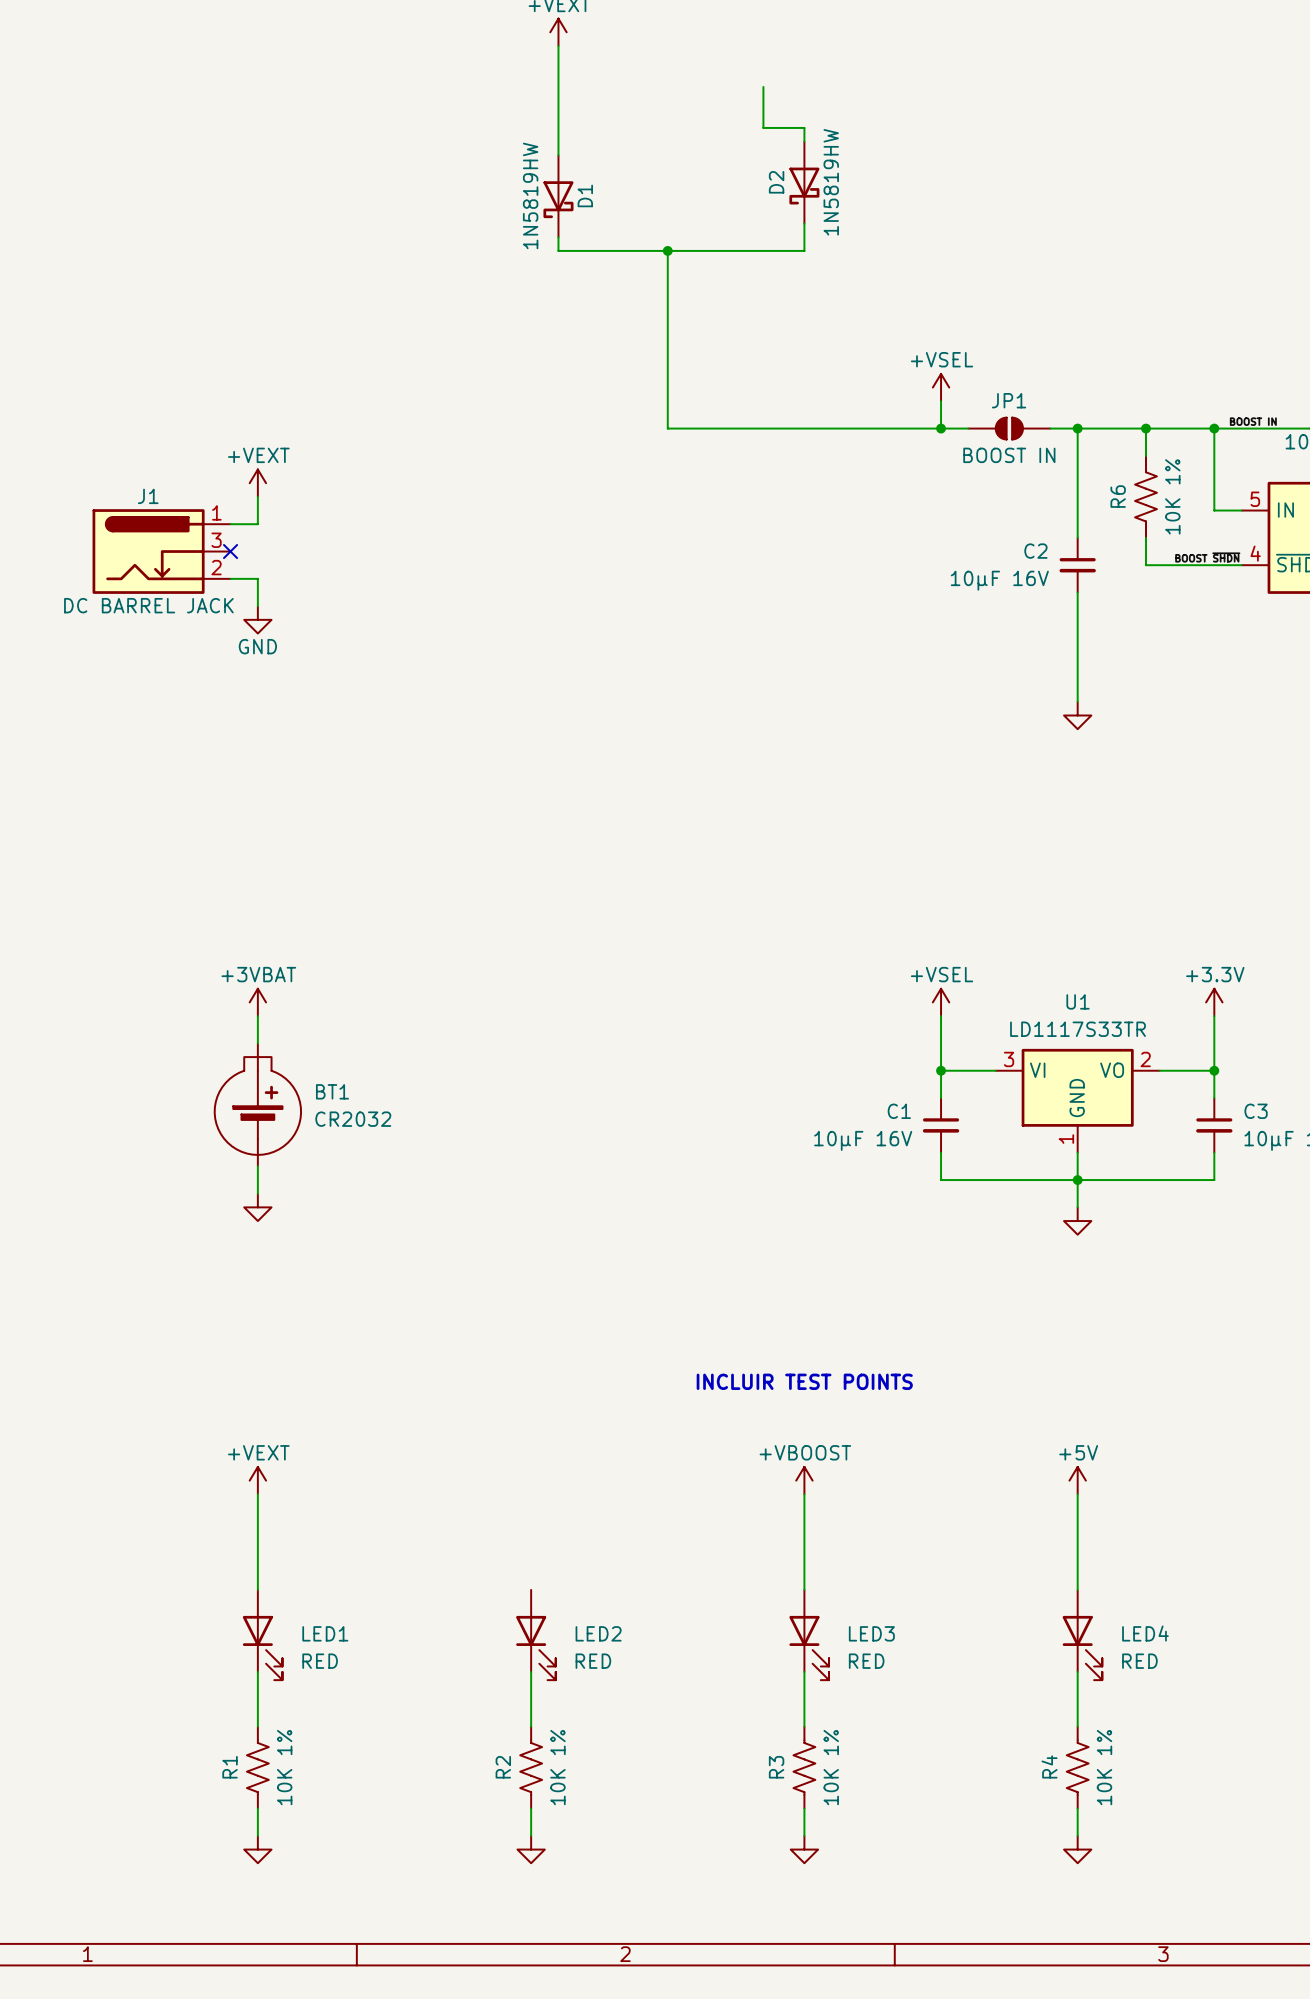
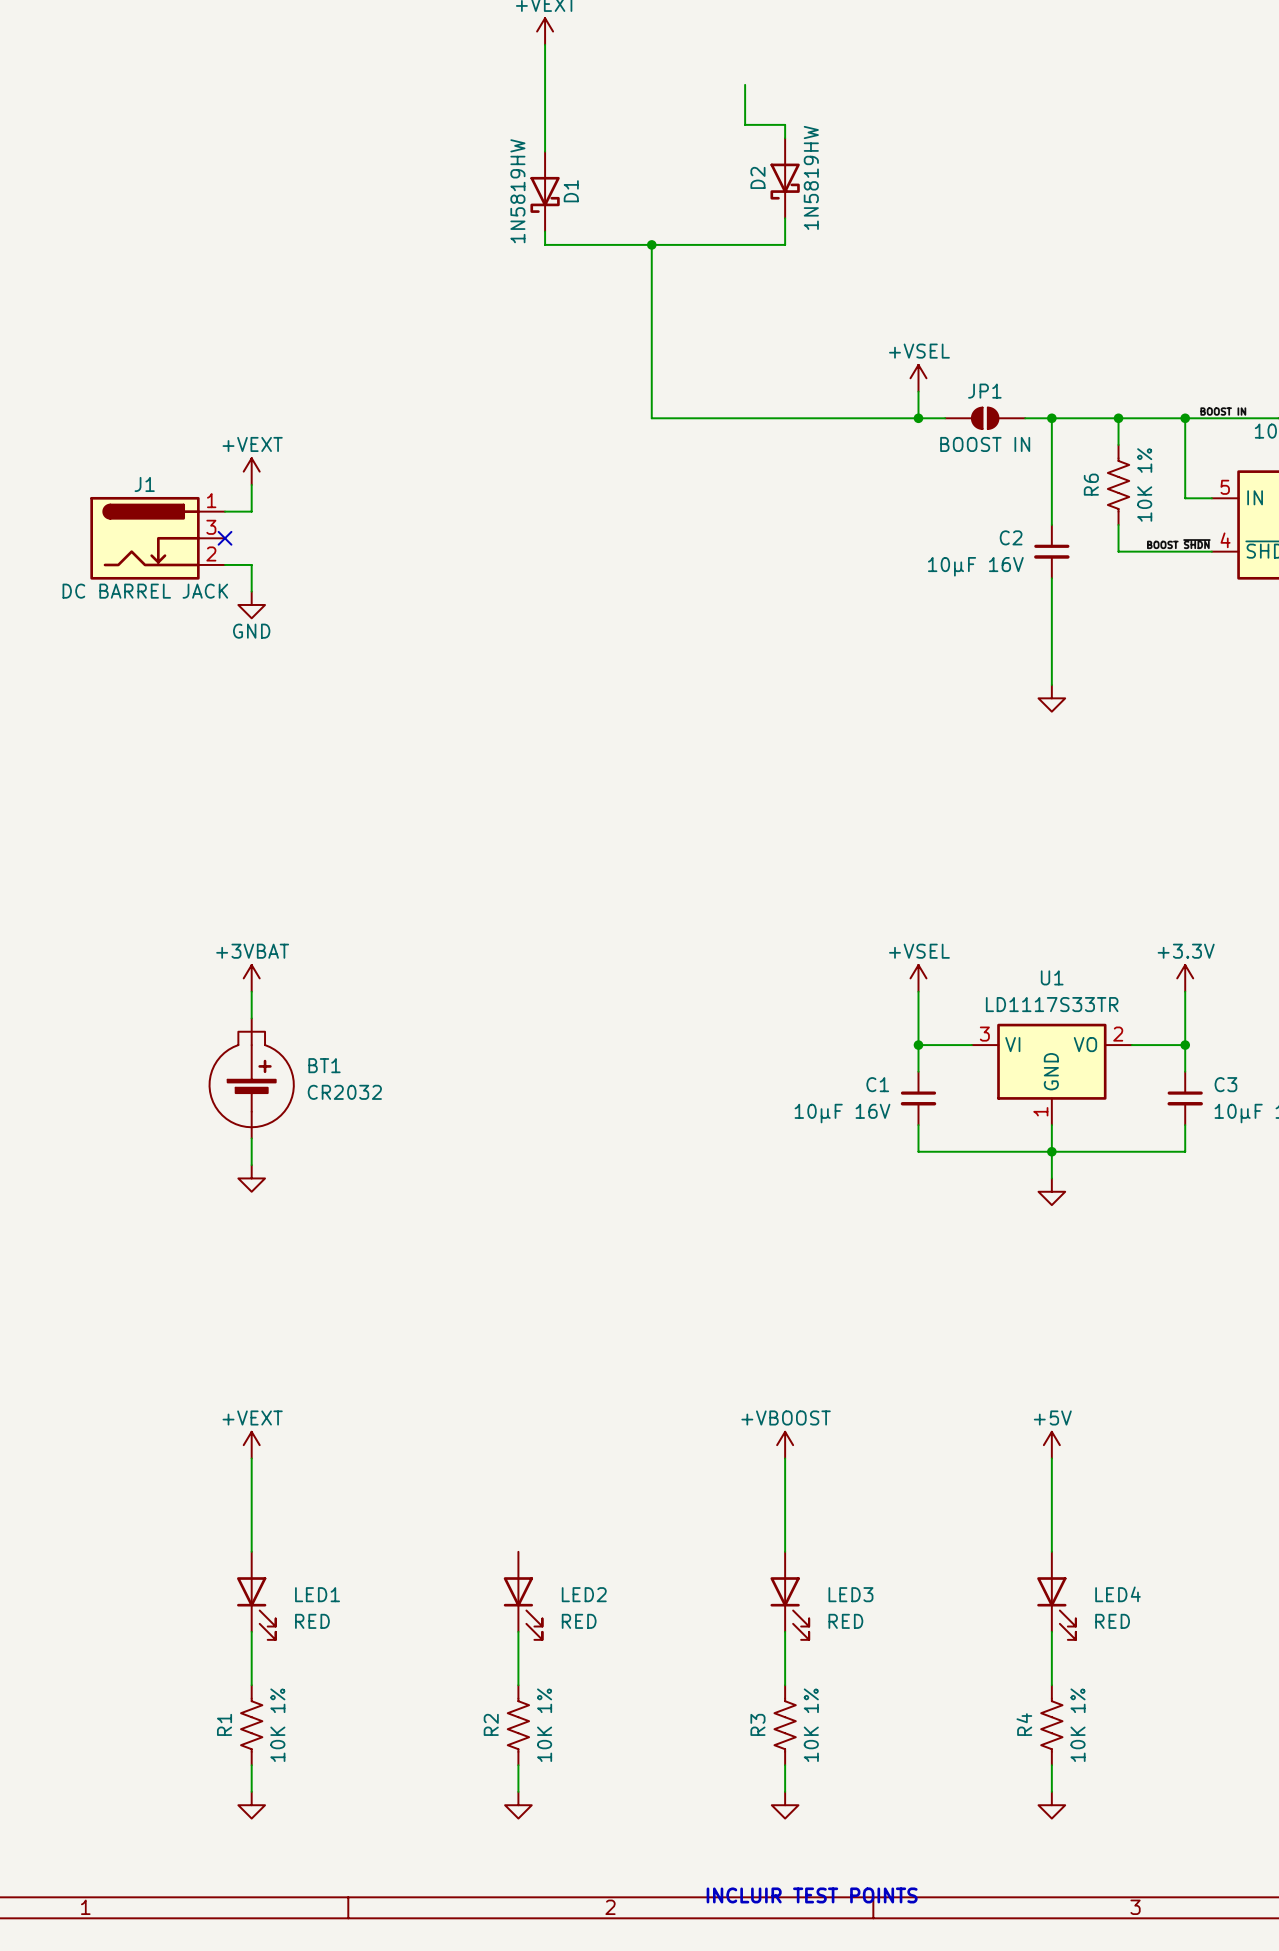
text: INCLUIR TEST POINTS (804, 1381) -> none
text: none -> INCLUIR TEST POINTS (812, 1895)

